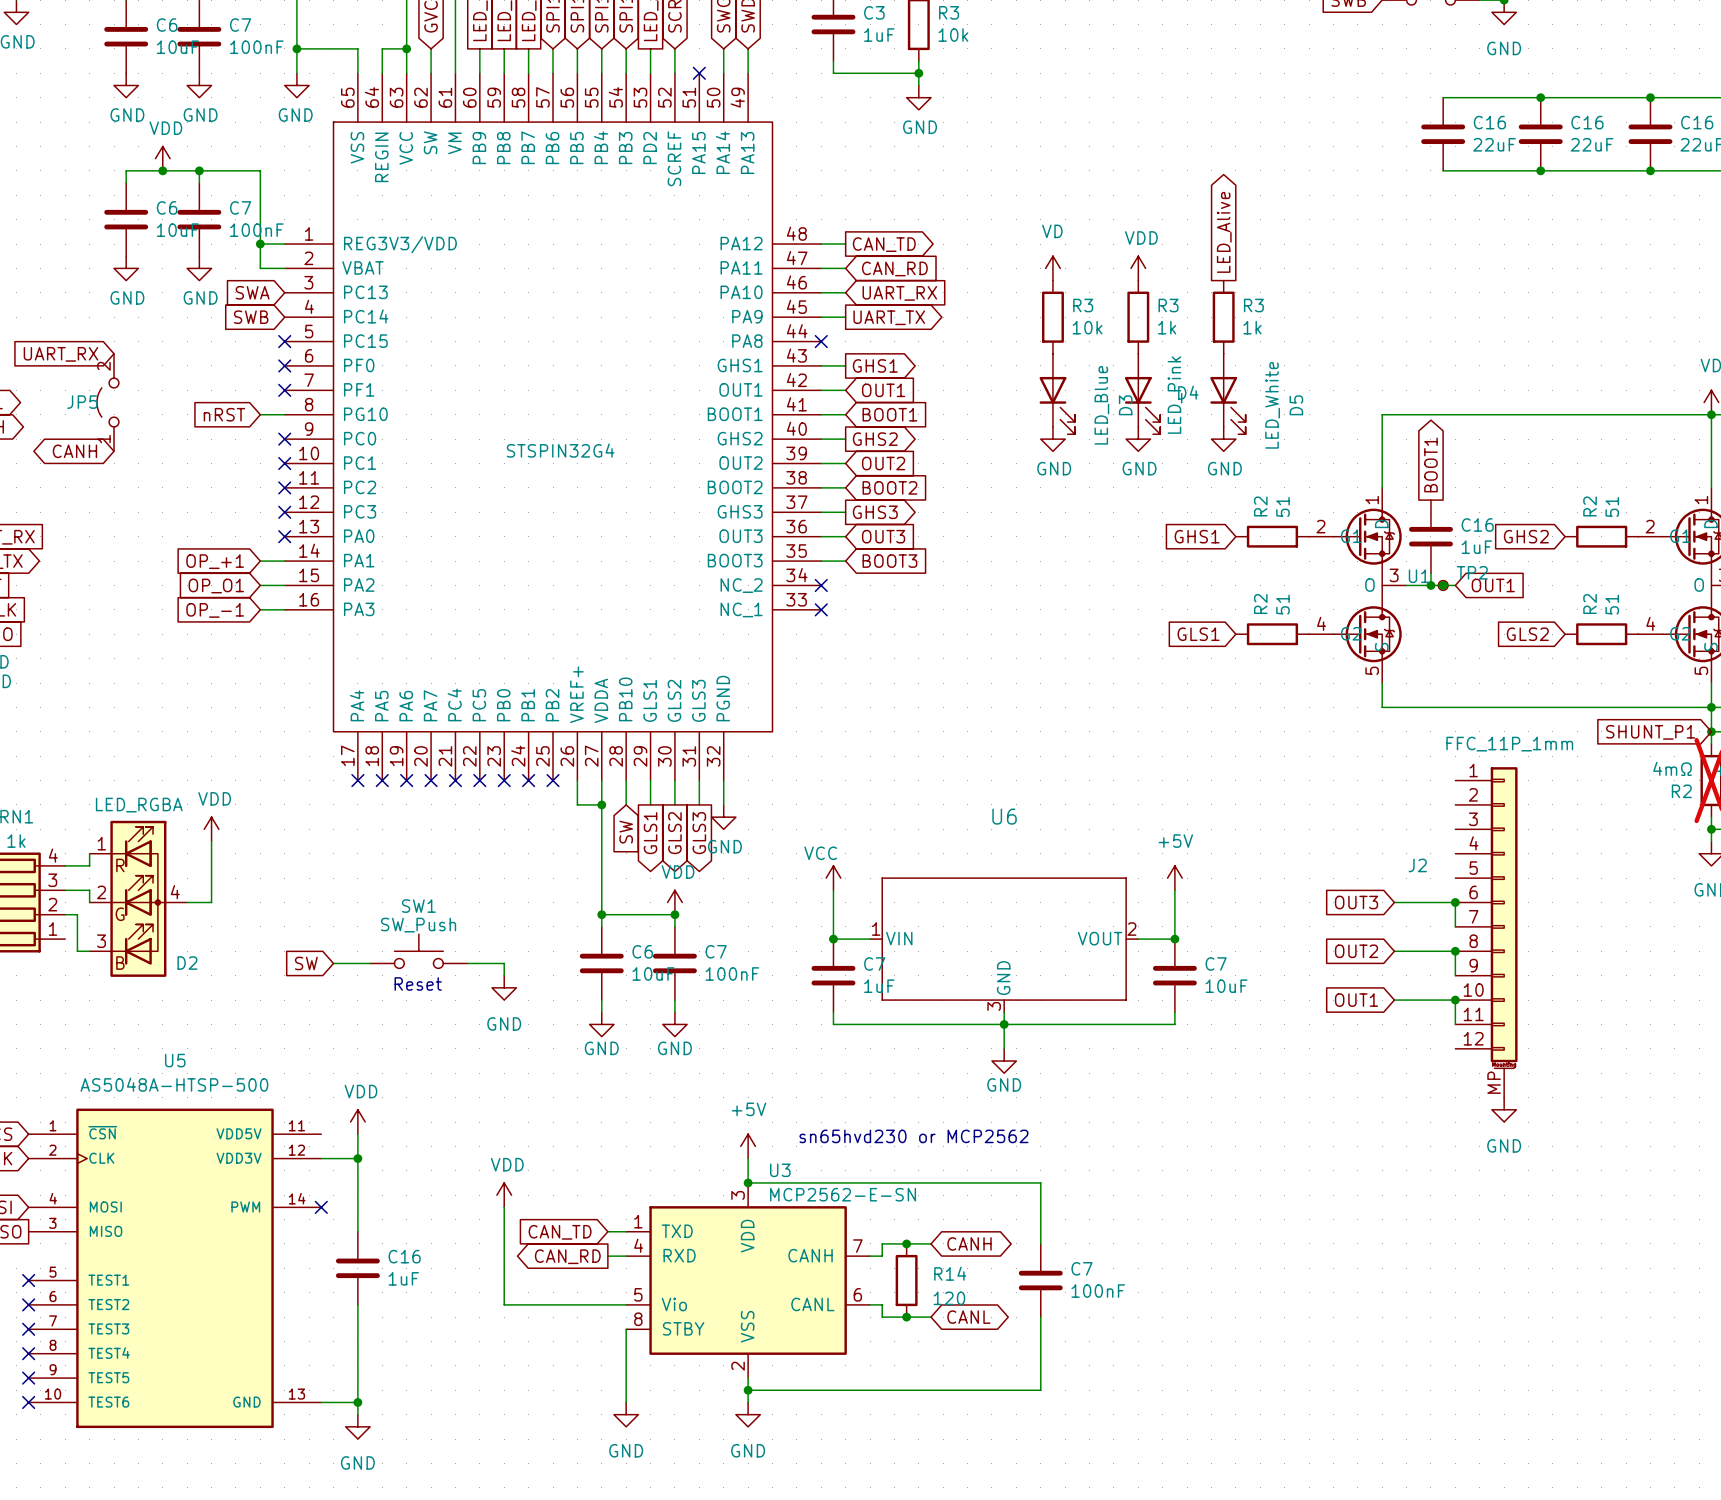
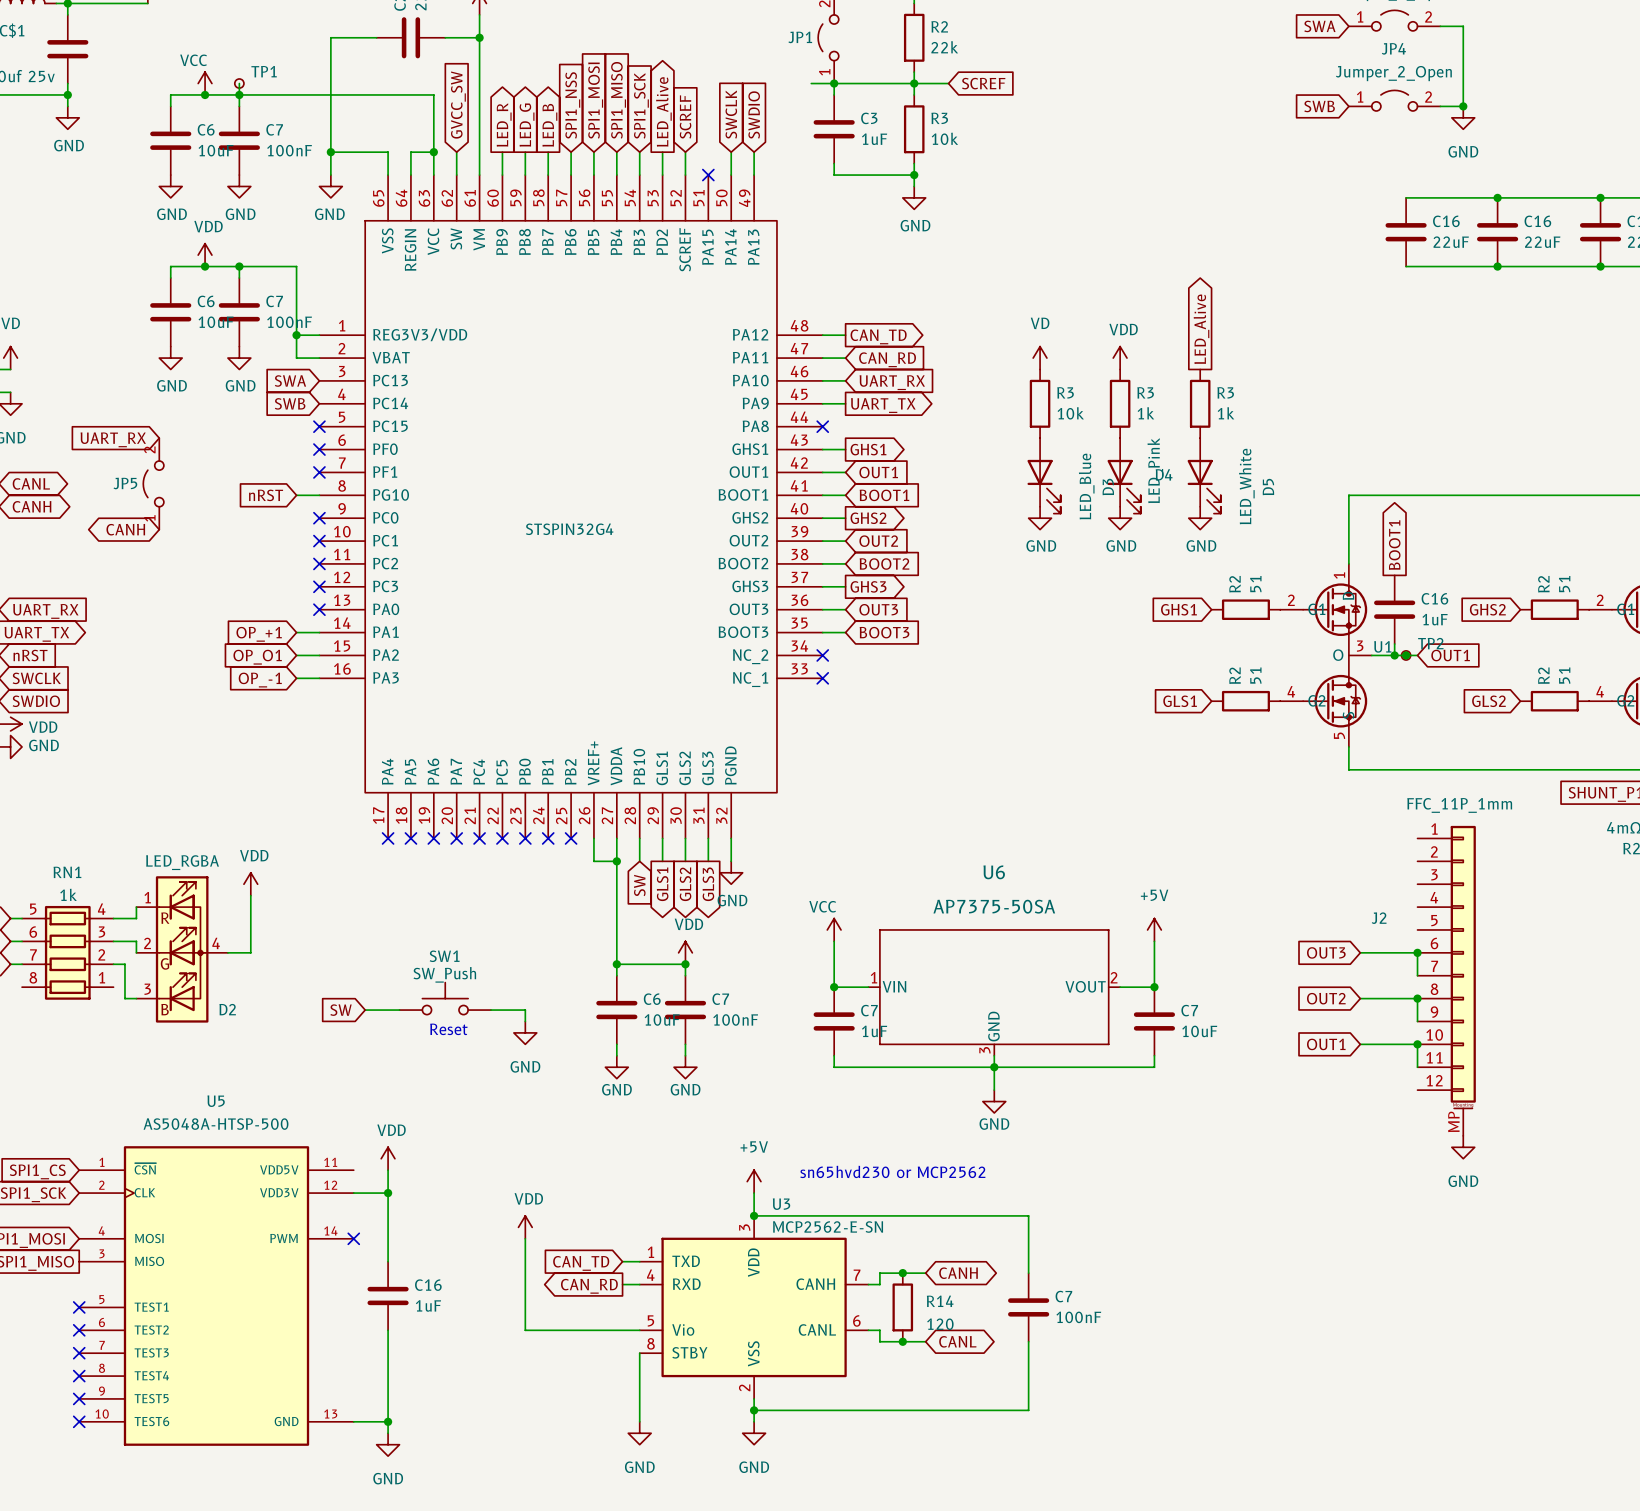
U6 value: none -> AP7375-50SA (994, 906)

